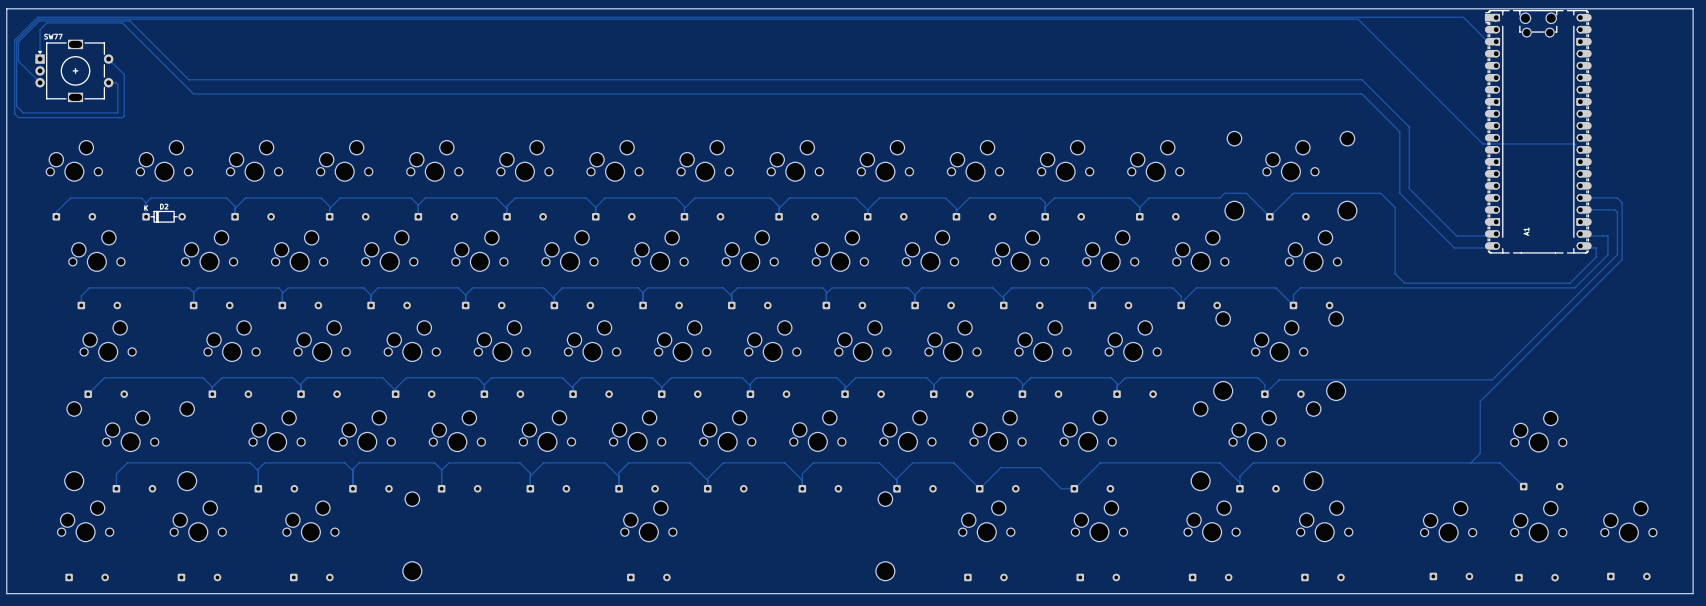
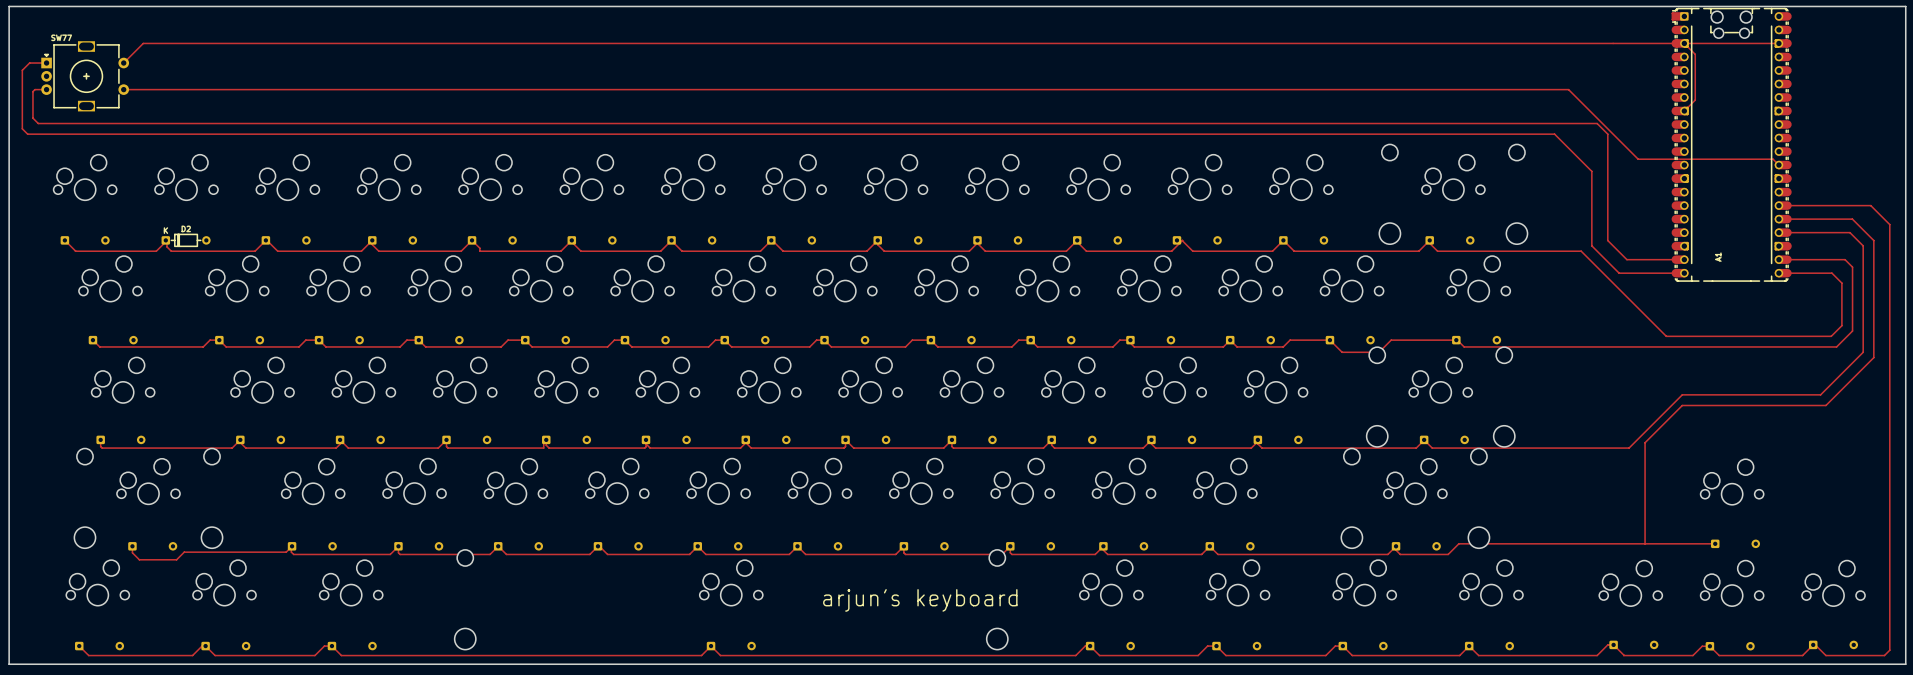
track: none -> (1684, 43) (1695, 54) (1695, 100) (1684, 111) (1680, 111)
track: (1493, 43) (1489, 43) (1463, 17) (37, 17) (14, 40) (14, 113) (18, 117) (122, 117) (124, 115) (124, 74) (108, 59) -> (1778, 43) (143, 43) (123, 63)
track: (40, 59) (40, 29) (46, 22) (122, 22) (193, 93) (1361, 93) (1399, 131) (1399, 193) (1454, 247) (1493, 247) -> (46, 63) (29, 63) (22, 70) (22, 128) (27, 134) (1554, 134) (1591, 171) (1591, 245) (1619, 273) (1684, 273)
track: (40, 82) (18, 61) (18, 41) (39, 21) (130, 21) (188, 79) (1361, 79) (1409, 127) (1409, 188) (1456, 235) (1493, 235) -> (46, 89) (34, 89) (32, 91) (32, 118) (38, 123)
track: (116, 82) (117, 84) (117, 112) -> (1684, 259) (1626, 259) (1607, 240) (1607, 134) (1597, 123) (134, 123)
track: (32, 112) (23, 112) (16, 106) (16, 41) (38, 19) (1358, 19) (1482, 143) (1575, 144) -> (132, 89) (1568, 89) (1638, 159) (1773, 159)
track: none -> (1778, 205) (1870, 205) (1889, 224) (1889, 650) (1884, 655) (1825, 655) (1815, 644) (1802, 655) (1719, 655) (1709, 646) (1702, 646) (1692, 655) (1623, 655) (1613, 644) (1607, 644) (1597, 655) (1478, 655) (1469, 646) (1459, 655) (1352, 655) (1342, 646) (1335, 646) (1325, 655) (1225, 655) (1216, 646) (1207, 646) (1198, 655) (1099, 655) (1090, 646) (1085, 646) (1075, 655) (720, 655) (711, 646) (701, 655) (341, 655) (331, 646) (324, 646) (314, 655) (215, 655) (205, 646) (202, 646) (192, 655) (88, 655) (79, 646)
track: (1617, 197) (1622, 202) (1622, 259) (1480, 401) (1480, 453) (1470, 462) -> (1820, 219) (1852, 219) (1873, 240) (1873, 357) (1825, 405) (1682, 405) (1645, 442) (1645, 543)
track: (146, 202) (141, 198) (70, 198) (56, 212) (56, 216) -> none
track: (418, 205) (411, 198) (340, 198) (329, 208) -> none
track: (595, 207) (586, 198) (515, 198) (507, 206) (507, 216) -> none
track: (1045, 207) (1054, 198) (1130, 198) (1139, 207) -> none
track: (235, 208) (245, 198) (321, 198) (329, 206) (329, 216) -> (64, 240) (75, 251) (156, 251) (166, 240) (166, 246) (171, 251) (255, 251) (265, 240) (277, 251) (361, 251) (372, 240)
track: (507, 208) (496, 198) (425, 198) (418, 204) (418, 216) -> none
track: (684, 208) (694, 198) (770, 198) (779, 206) (779, 216) -> none
track: (779, 208) (789, 198) (855, 198) (867, 209) -> none
track: (1614, 209) (1617, 212) (1617, 254) (1492, 379) (1279, 379) (1264, 394) (1264, 384) (1257, 377) (1125, 377) (1117, 386) -> (1817, 232) (1849, 232) (1863, 245) (1863, 352) (1820, 394) (1682, 394) (1629, 448) (1432, 448) (1424, 439)
track: (956, 210) (969, 198) (1040, 198) (1045, 202) (1045, 216) -> none
track: (146, 216) (146, 202) (150, 198) (226, 198) (235, 206) (235, 216) -> none
track: none -> (372, 240) (372, 244) (378, 251) (461, 251) (472, 240) (479, 248) (479, 251) (560, 251) (571, 240) (580, 251) (660, 251) (671, 240) (682, 251) (760, 251) (771, 240) (783, 251) (866, 251) (877, 240) (877, 244) (884, 251) (969, 251) (977, 243)
track: (595, 216) (595, 207) (605, 198) (676, 198) (684, 206) (684, 216) -> none
track: (867, 216) (867, 209) (879, 198) (945, 198) (956, 208) (956, 216) -> (977, 240) (977, 243) (985, 251) (1066, 251) (1077, 240) (1086, 251) (1171, 251) (1182, 240) (1192, 251) (1272, 251) (1283, 240) (1293, 251) (1418, 251) (1429, 240) (1429, 243) (1437, 251) (1581, 251) (1666, 336) (1831, 336) (1841, 325) (1841, 283) (1831, 273) (1778, 273)
track: (1139, 216) (1139, 207) (1149, 198) (1220, 198) (1224, 193) (1246, 193) (1269, 216) (1293, 193) (1380, 193) (1395, 207) (1395, 273) (1404, 283) (1570, 283) (1596, 257) (1595, 247) (1581, 247) -> none
track: (1581, 235) (1607, 235) (1607, 254) (1574, 287) (1300, 287) (1293, 294) (1293, 305) (1275, 287) (1196, 287) (1181, 303) -> none
track: (193, 292) (188, 287) (89, 287) (81, 296) (81, 305) -> (1783, 259) (1845, 259) (1852, 267) (1852, 331) (1836, 346) (1464, 346) (1457, 340) (1391, 340) (1379, 352) (1342, 352) (1329, 340) (1290, 340) (1283, 346) (1237, 346) (1230, 340) (1223, 346) (1134, 346) (1130, 340) (1119, 340) (1113, 346) (1037, 346) (1030, 340) (1018, 340) (1011, 346) (937, 346) (930, 340) (912, 340) (905, 346) (831, 346) (824, 340) (816, 340) (809, 346) (731, 346) (724, 340) (715, 340) (708, 346) (631, 346) (625, 340) (614, 340) (607, 346) (532, 346) (525, 340) (508, 340) (501, 346) (425, 346) (418, 340) (406, 340) (400, 346) (325, 346) (319, 340) (305, 340) (298, 346) (226, 346) (219, 340) (210, 340) (203, 346) (99, 346) (92, 340)
track: (643, 292) (638, 287) (562, 287) (554, 296) (554, 305) -> none
track: (282, 293) (288, 287) (363, 287) (371, 295) -> none
track: (826, 293) (832, 287) (907, 287) (915, 295) -> none
track: (465, 295) (458, 287) (378, 287) (371, 294) (371, 305) -> none
track: (731, 296) (723, 287) (647, 287) (643, 292) (643, 305) -> none
track: (1092, 297) (1101, 287) (1172, 287) (1181, 296) (1181, 305) -> none
track: (554, 298) (543, 287) (472, 287) (465, 294) (465, 305) -> none
track: (1003, 298) (992, 287) (922, 287) (915, 294) (915, 305) -> none
track: (193, 305) (193, 292) (198, 287) (278, 287) (282, 291) (282, 305) -> none
track: (731, 305) (731, 293) (737, 287) (822, 287) (826, 291) (826, 305) -> none
track: (1092, 305) (1092, 292) (1087, 287) (1011, 287) (1003, 296) (1002, 306) -> none
track: (484, 384) (491, 377) (562, 377) (573, 388) -> none
track: (933, 384) (940, 377) (1016, 377) (1022, 383) (1022, 394) -> none
track: (301, 385) (292, 377) (221, 377) (212, 387) -> none
track: (750, 385) (742, 377) (671, 377) (661, 387) -> none
track: (1022, 386) (1030, 377) (1111, 377) (1117, 383) (1117, 394) -> (1424, 439) (1416, 448) (1261, 448) (1257, 443) (1257, 439)
track: (845, 388) (855, 377) (926, 377) (933, 384) (933, 394) -> none
track: (395, 390) (382, 377) (307, 377) (301, 383) (301, 394) -> none
track: (88, 394) (104, 377) (202, 377) (212, 387) (212, 394) -> (100, 439) (102, 448) (232, 448) (240, 439) (240, 442) (245, 448) (336, 448) (340, 444) (340, 439) (348, 448) (438, 448) (446, 439) (447, 448) (543, 448) (543, 442) (546, 439) (546, 445) (549, 448) (644, 448) (646, 439)
track: (395, 394) (395, 388) (406, 377) (477, 377) (484, 384) (484, 394) -> none
track: (573, 394) (573, 386) (581, 377) (652, 377) (661, 387) (661, 394) -> (646, 443) (650, 448) (740, 448) (745, 442) (745, 439)
track: (750, 394) (750, 383) (756, 377) (836, 377) (845, 385) (845, 394) -> none
track: none -> (1257, 441) (1251, 448) (1155, 448) (1151, 443) (1151, 439) (1143, 448) (1054, 448) (1051, 445) (1051, 439) (1043, 448) (953, 448) (951, 439) (943, 448) (853, 448) (845, 439) (844, 448) (751, 448) (745, 442)
track: (258, 470) (250, 462) (127, 462) (116, 473) (116, 488) -> (292, 546) (286, 552) (184, 552) (176, 559) (139, 559) (132, 552) (132, 546)
track: (352, 470) (344, 462) (264, 462) (258, 469) (258, 488) -> none
track: (441, 470) (448, 462) (519, 462) (530, 473) (530, 488) -> none
track: (530, 476) (543, 462) (605, 462) (619, 476) -> none
track: (707, 480) (690, 462) (628, 462) (619, 472) (619, 488) -> none
track: (802, 480) (784, 462) (723, 462) (707, 478) (707, 488) -> none
track: (896, 480) (879, 462) (813, 462) (802, 473) (802, 488) -> none
track: (1239, 482) (1220, 462) (1100, 462) (1074, 488) (1061, 488) (1040, 467) (1000, 467) (979, 488) (953, 462) (912, 462) (896, 478) (896, 488) -> none
track: (1243, 486) (1239, 488) (1239, 476) (1253, 462) (1500, 462) (1523, 486) -> (1102, 547) (1107, 554) (1201, 554) (1209, 546) (1217, 554) (1387, 554) (1396, 546) (1396, 550) (1400, 554) (1448, 554) (1458, 543) (1715, 543)
track: (352, 488) (352, 469) (359, 462) (434, 462) (441, 469) (441, 488) -> (291, 547) (291, 552) (293, 554) (390, 554) (398, 546) (400, 554) (490, 554) (498, 546)
track: none -> (498, 546) (506, 554) (589, 554) (597, 546) (607, 554) (689, 554) (697, 546) (705, 554) (789, 554) (797, 546) (805, 554) (895, 554) (903, 546) (905, 554) (1002, 554) (1010, 546) (1011, 554) (1095, 554) (1103, 546)
text: none -> arjun's keyboard (920, 600)

